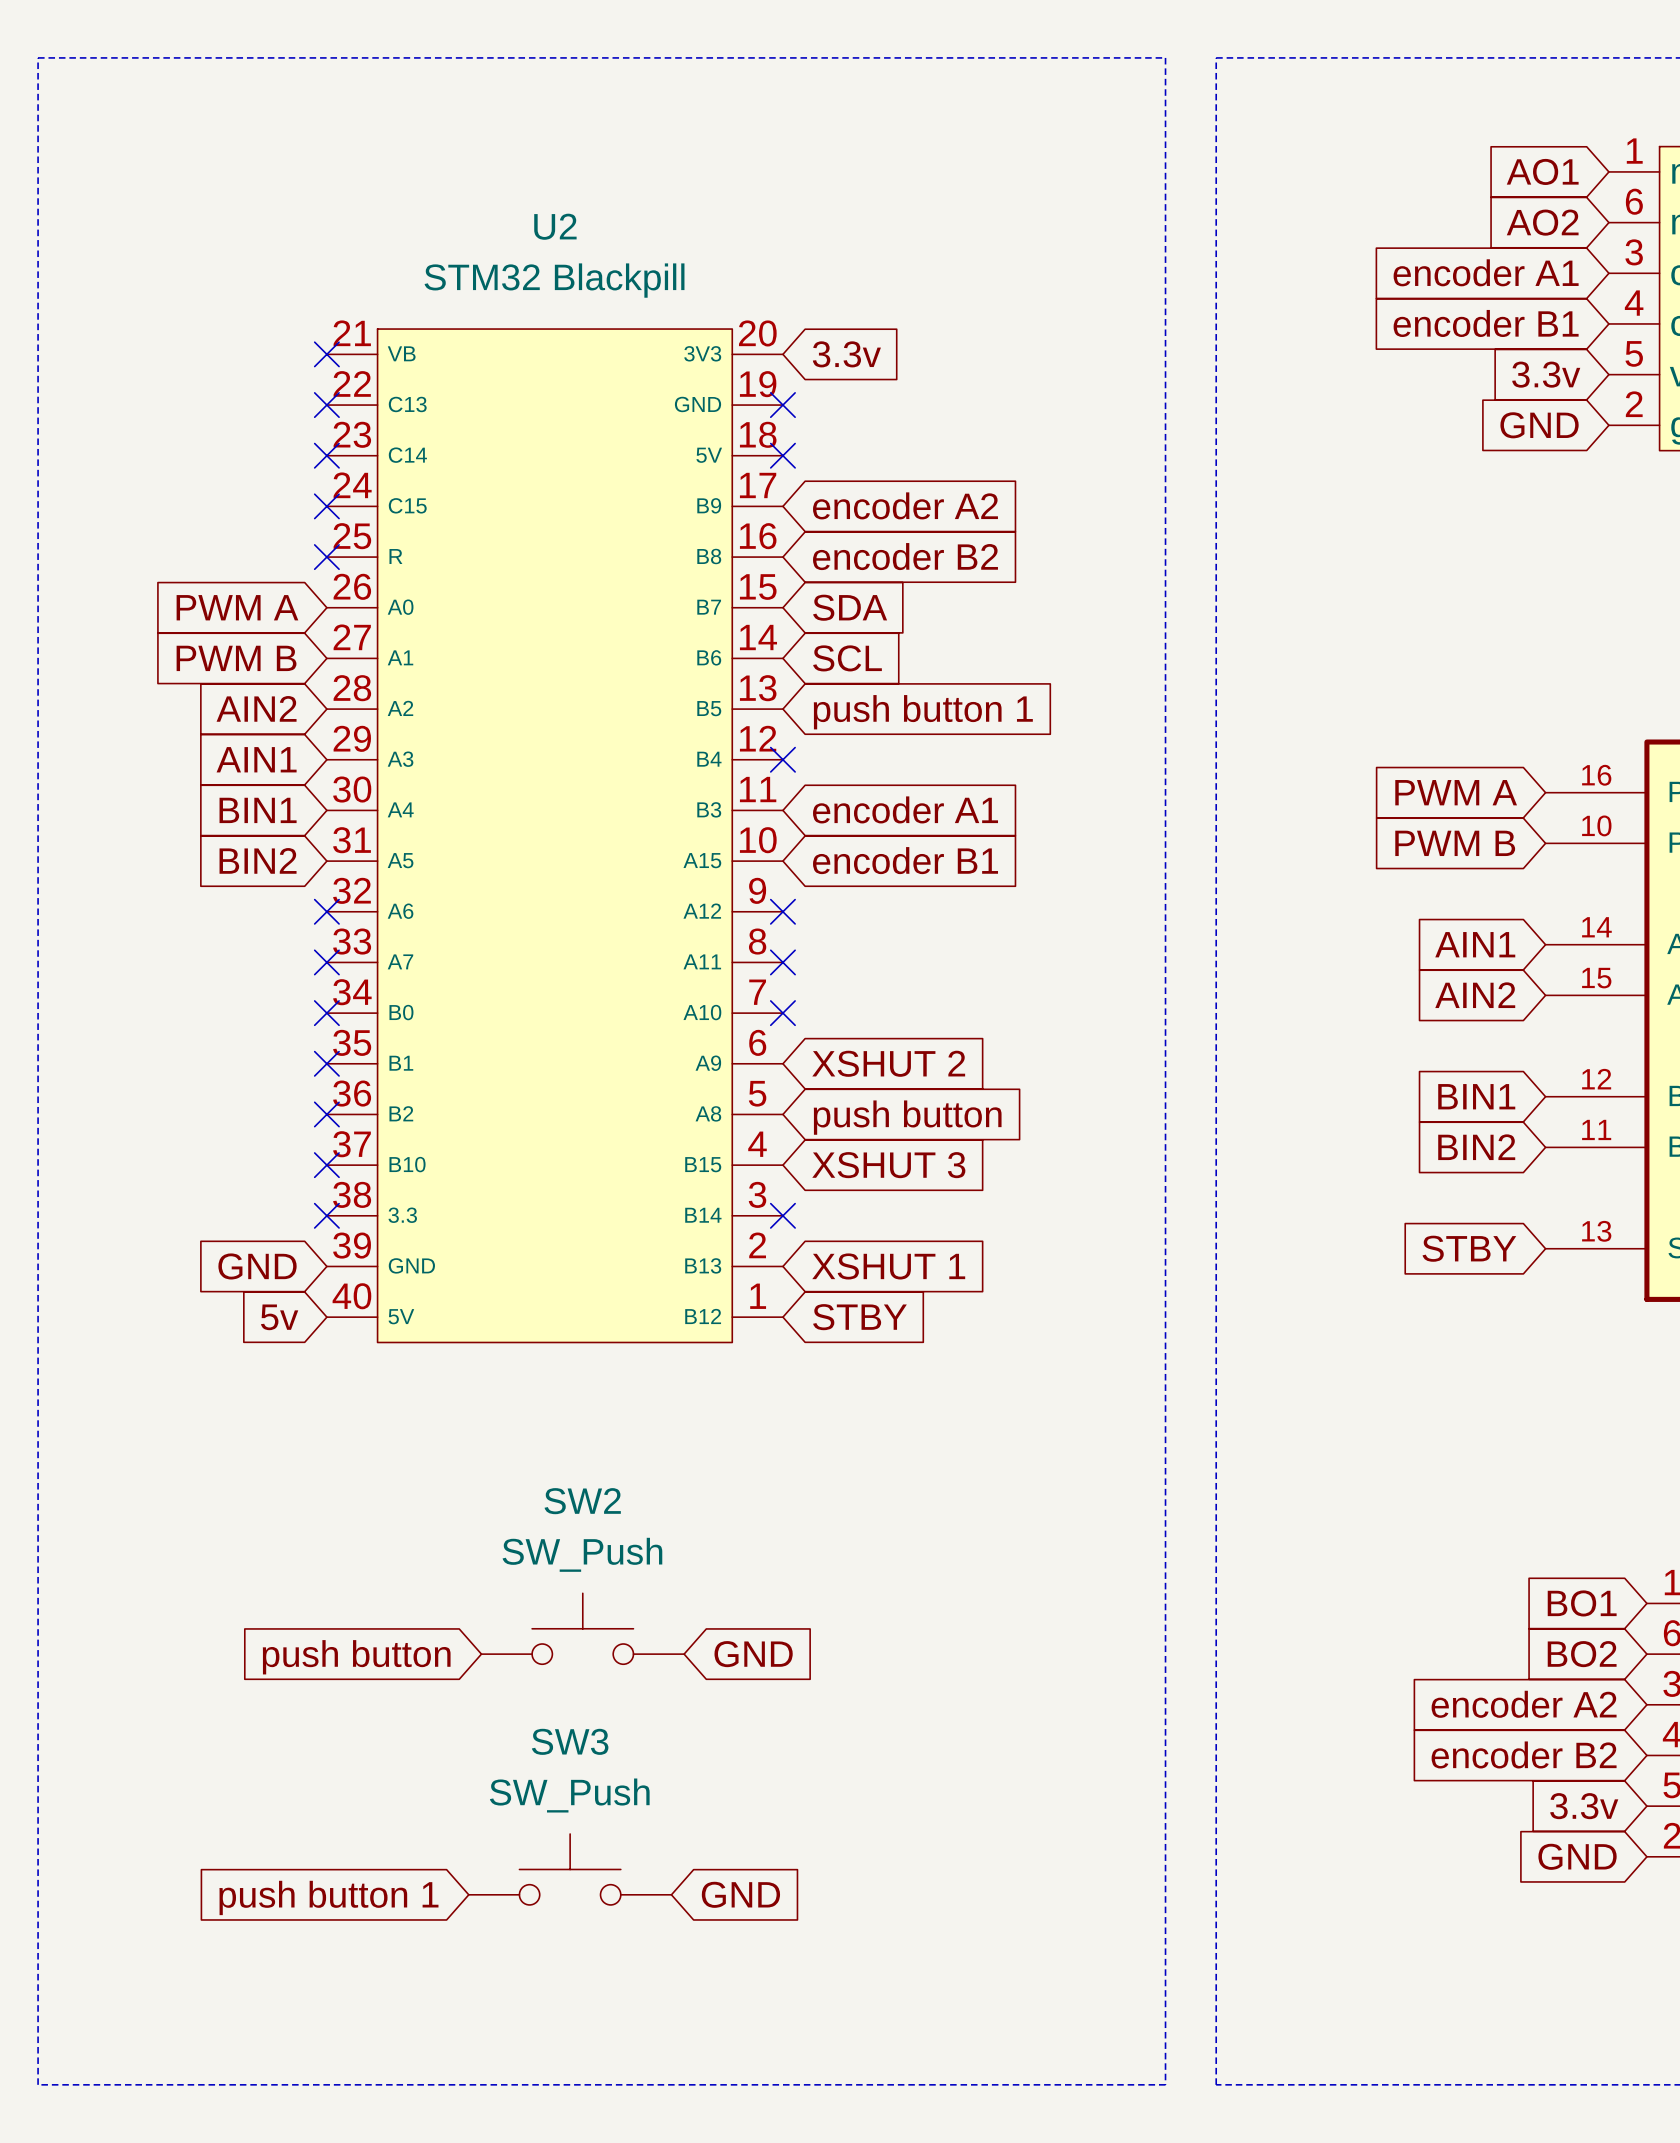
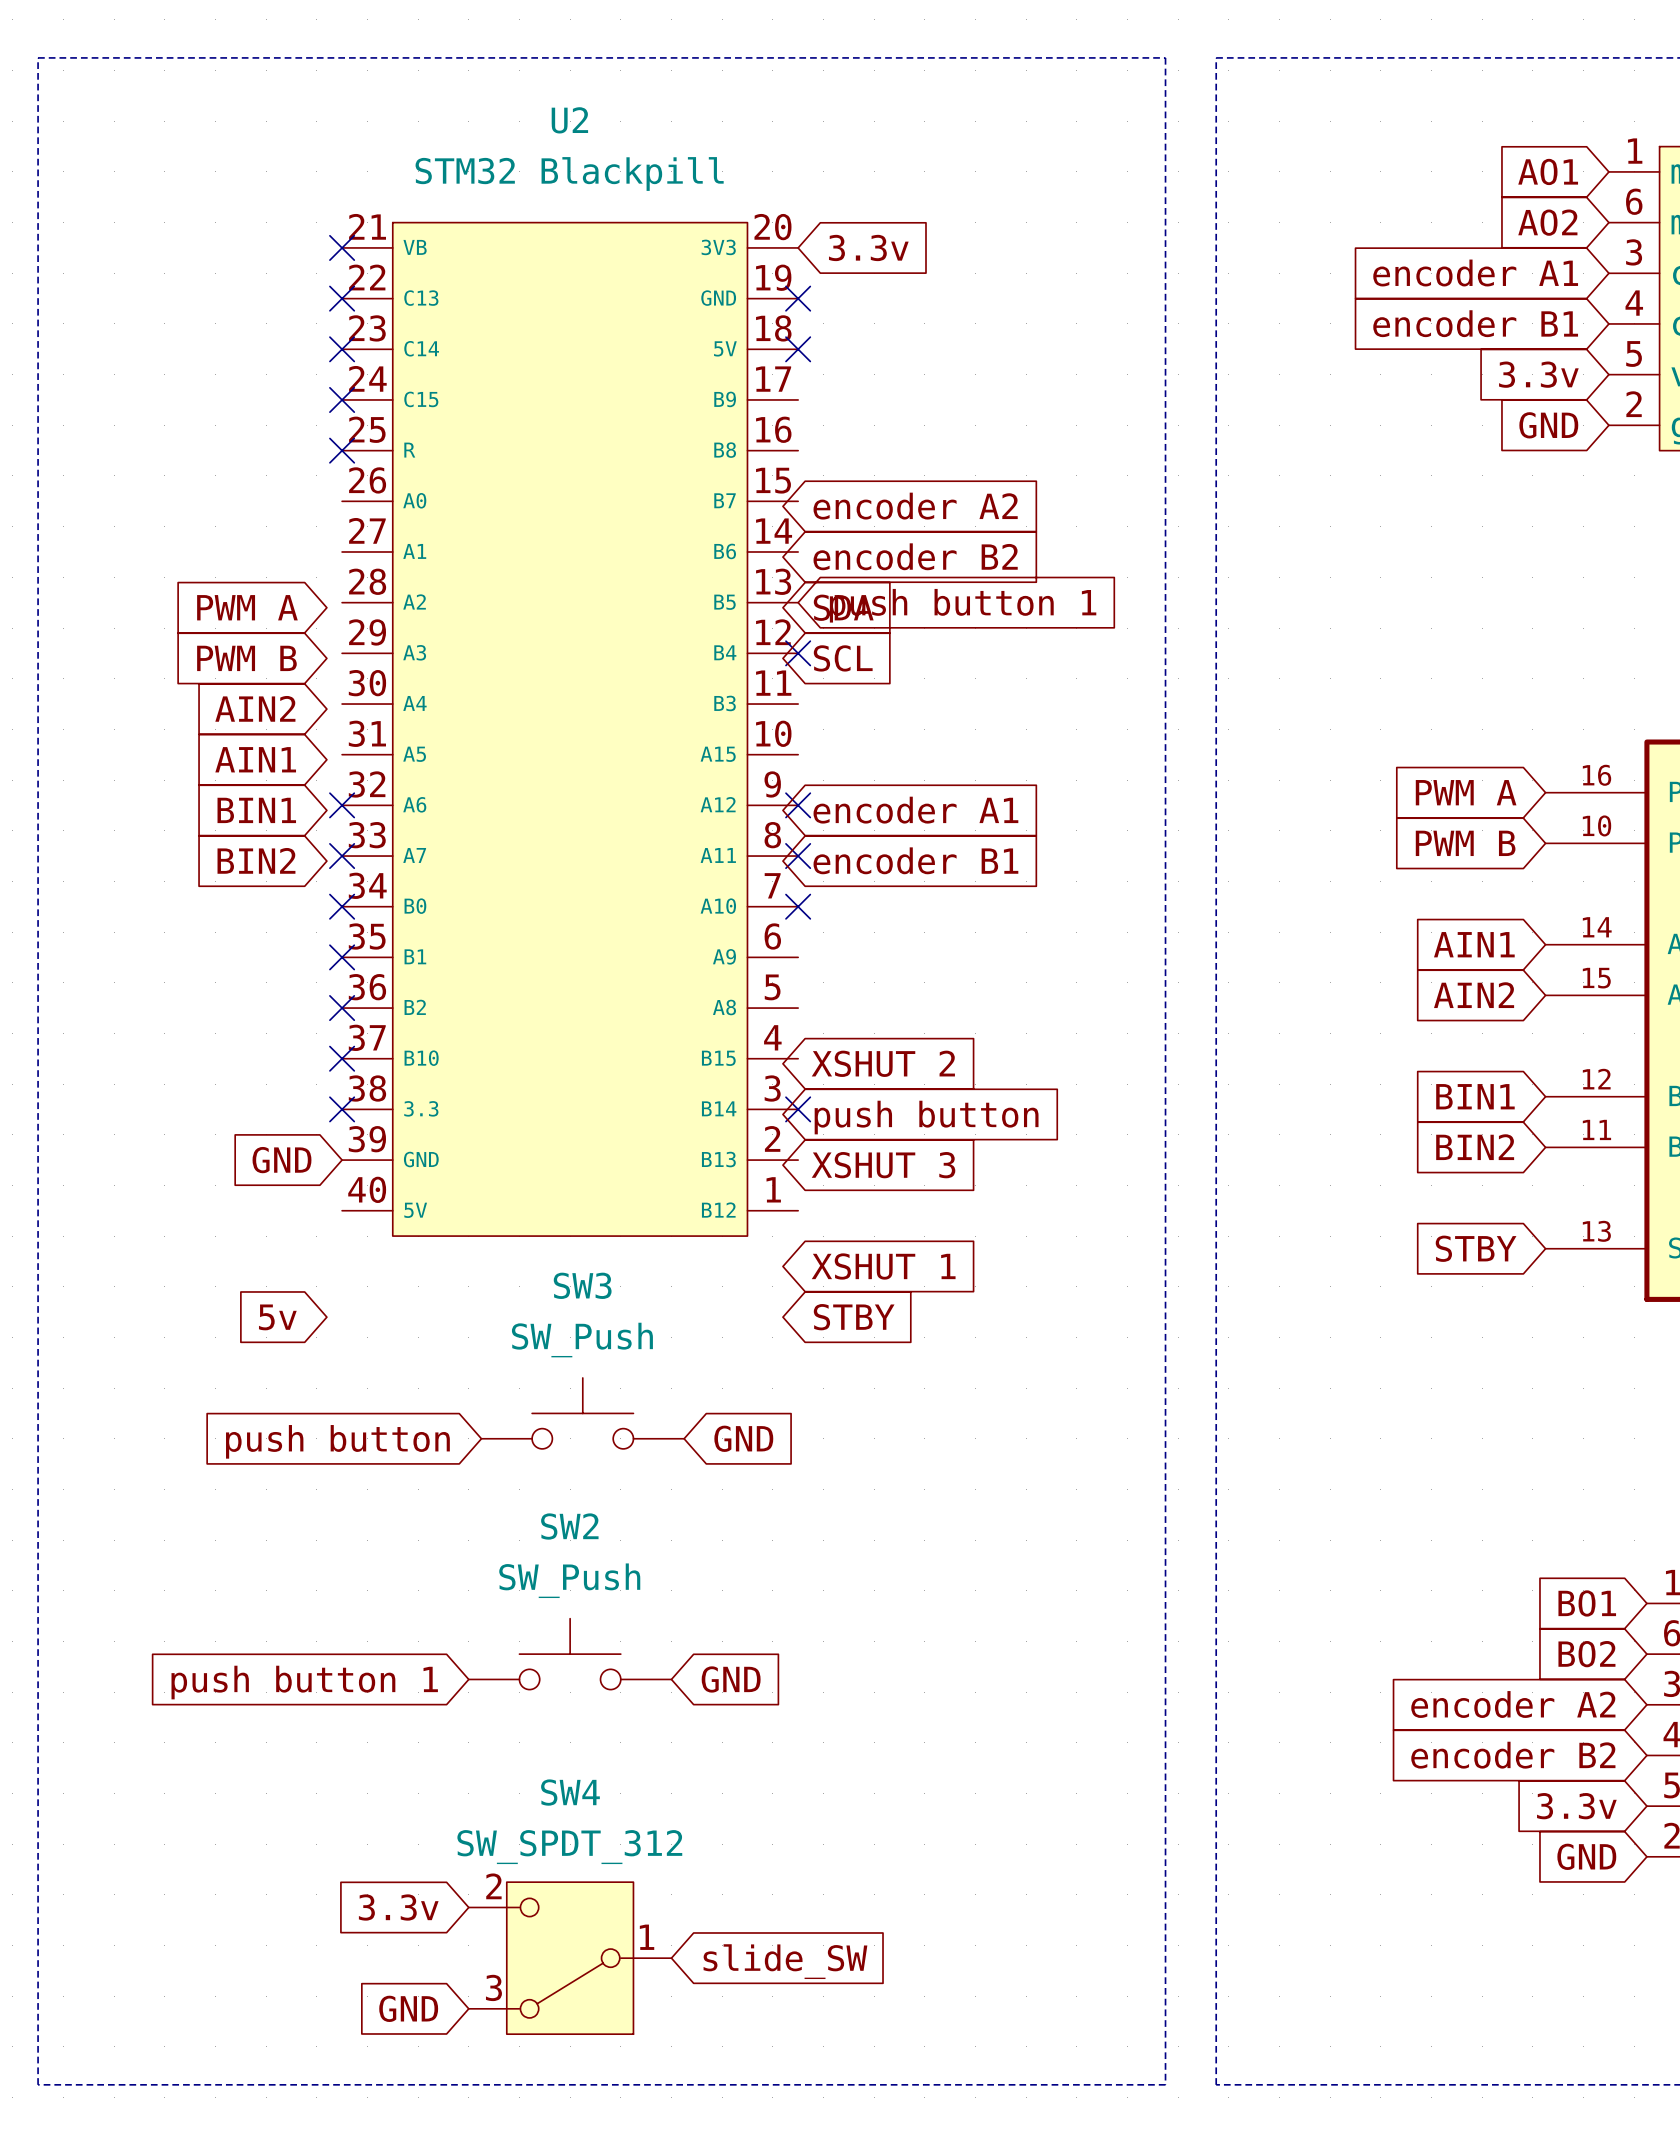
no-connect mark: none -> (342, 247)
no-connect mark: none -> (342, 298)
no-connect mark: none -> (798, 298)
no-connect mark: none -> (798, 349)
no-connect mark position: (326, 354) -> (342, 349)
global label position: 3.3v (846, 354) -> 3.3v (868, 247)
no-connect mark position: (326, 405) -> (342, 399)
no-connect mark: (782, 405) -> none
no-connect mark position: (326, 455) -> (342, 450)
no-connect mark: (782, 455) -> none
no-connect mark: (326, 506) -> none
no-connect mark: (326, 557) -> none
no-connect mark: none -> (798, 653)
global label position: push button 1 (923, 712) -> push button 1 (963, 605)
no-connect mark position: (782, 759) -> (798, 805)
no-connect mark: none -> (342, 805)
U2 position: (554, 835) -> (570, 729)
no-connect mark: none -> (342, 856)
no-connect mark: none -> (798, 856)
no-connect mark position: (326, 911) -> (342, 906)
no-connect mark position: (782, 911) -> (798, 906)
no-connect mark position: (326, 962) -> (342, 957)
no-connect mark: (782, 962) -> none
no-connect mark position: (326, 1013) -> (342, 1008)
no-connect mark: (782, 1013) -> none
no-connect mark position: (326, 1063) -> (342, 1058)
no-connect mark: none -> (798, 1109)
no-connect mark position: (326, 1114) -> (342, 1109)
no-connect mark: (326, 1165) -> none
no-connect mark: (326, 1215) -> none
no-connect mark: (782, 1215) -> none
global label position: GND (257, 1266) -> GND (281, 1160)
global label: none -> GND (743, 1438)
SW2 position: (582, 1628) -> (570, 1654)
global label position: GND (753, 1654) -> GND (731, 1679)
global label position: push button (356, 1657) -> push button (337, 1441)
SW3 position: (570, 1869) -> (582, 1413)
global label: GND (740, 1894) -> none
global label position: push button 1 (328, 1897) -> push button 1 (304, 1682)
global label: none -> 3.3v (398, 1907)
SW4: none -> SW_SPDT_312 (570, 1958)
global label: none -> slide_SW (785, 1961)
global label: none -> GND (408, 2008)

